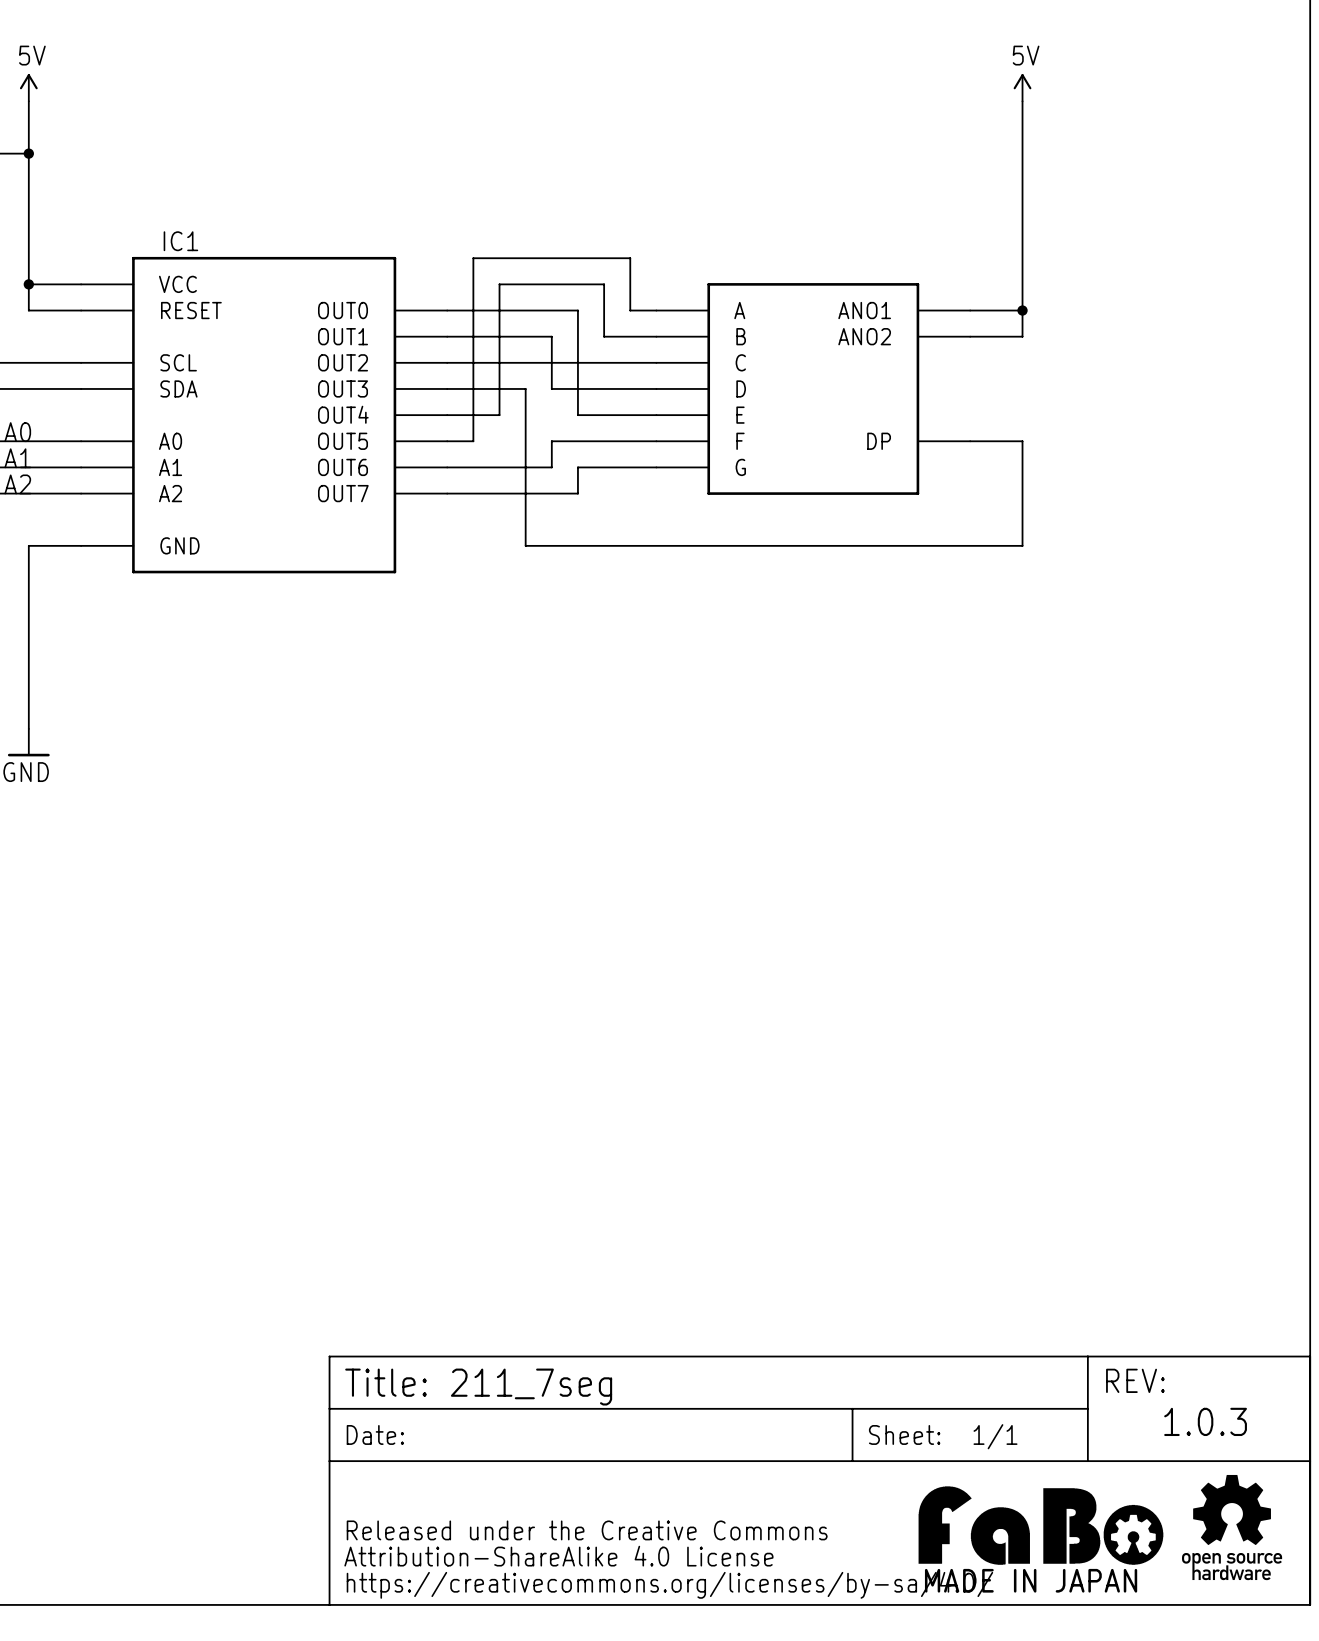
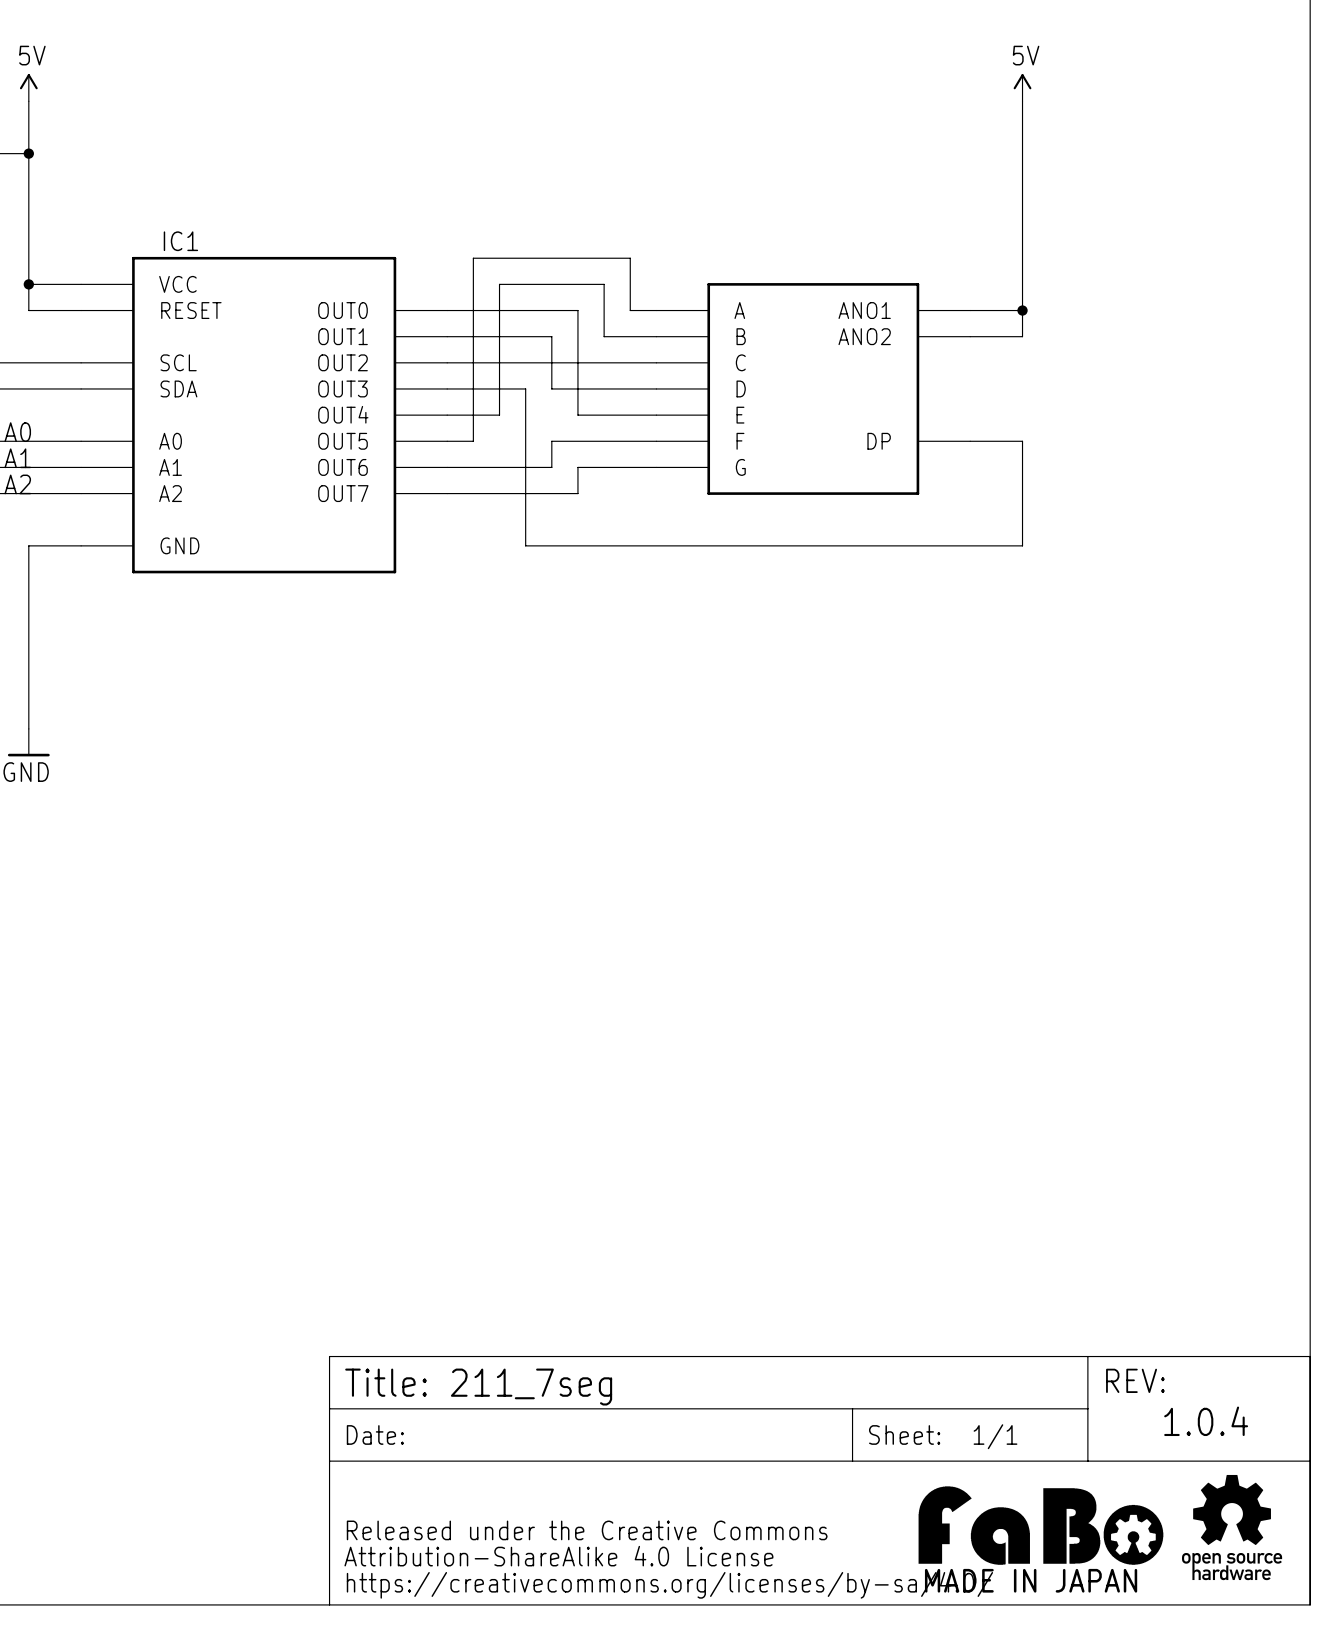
text: 1.0.3 (1205, 1421) -> 1.0.4 (1206, 1421)

